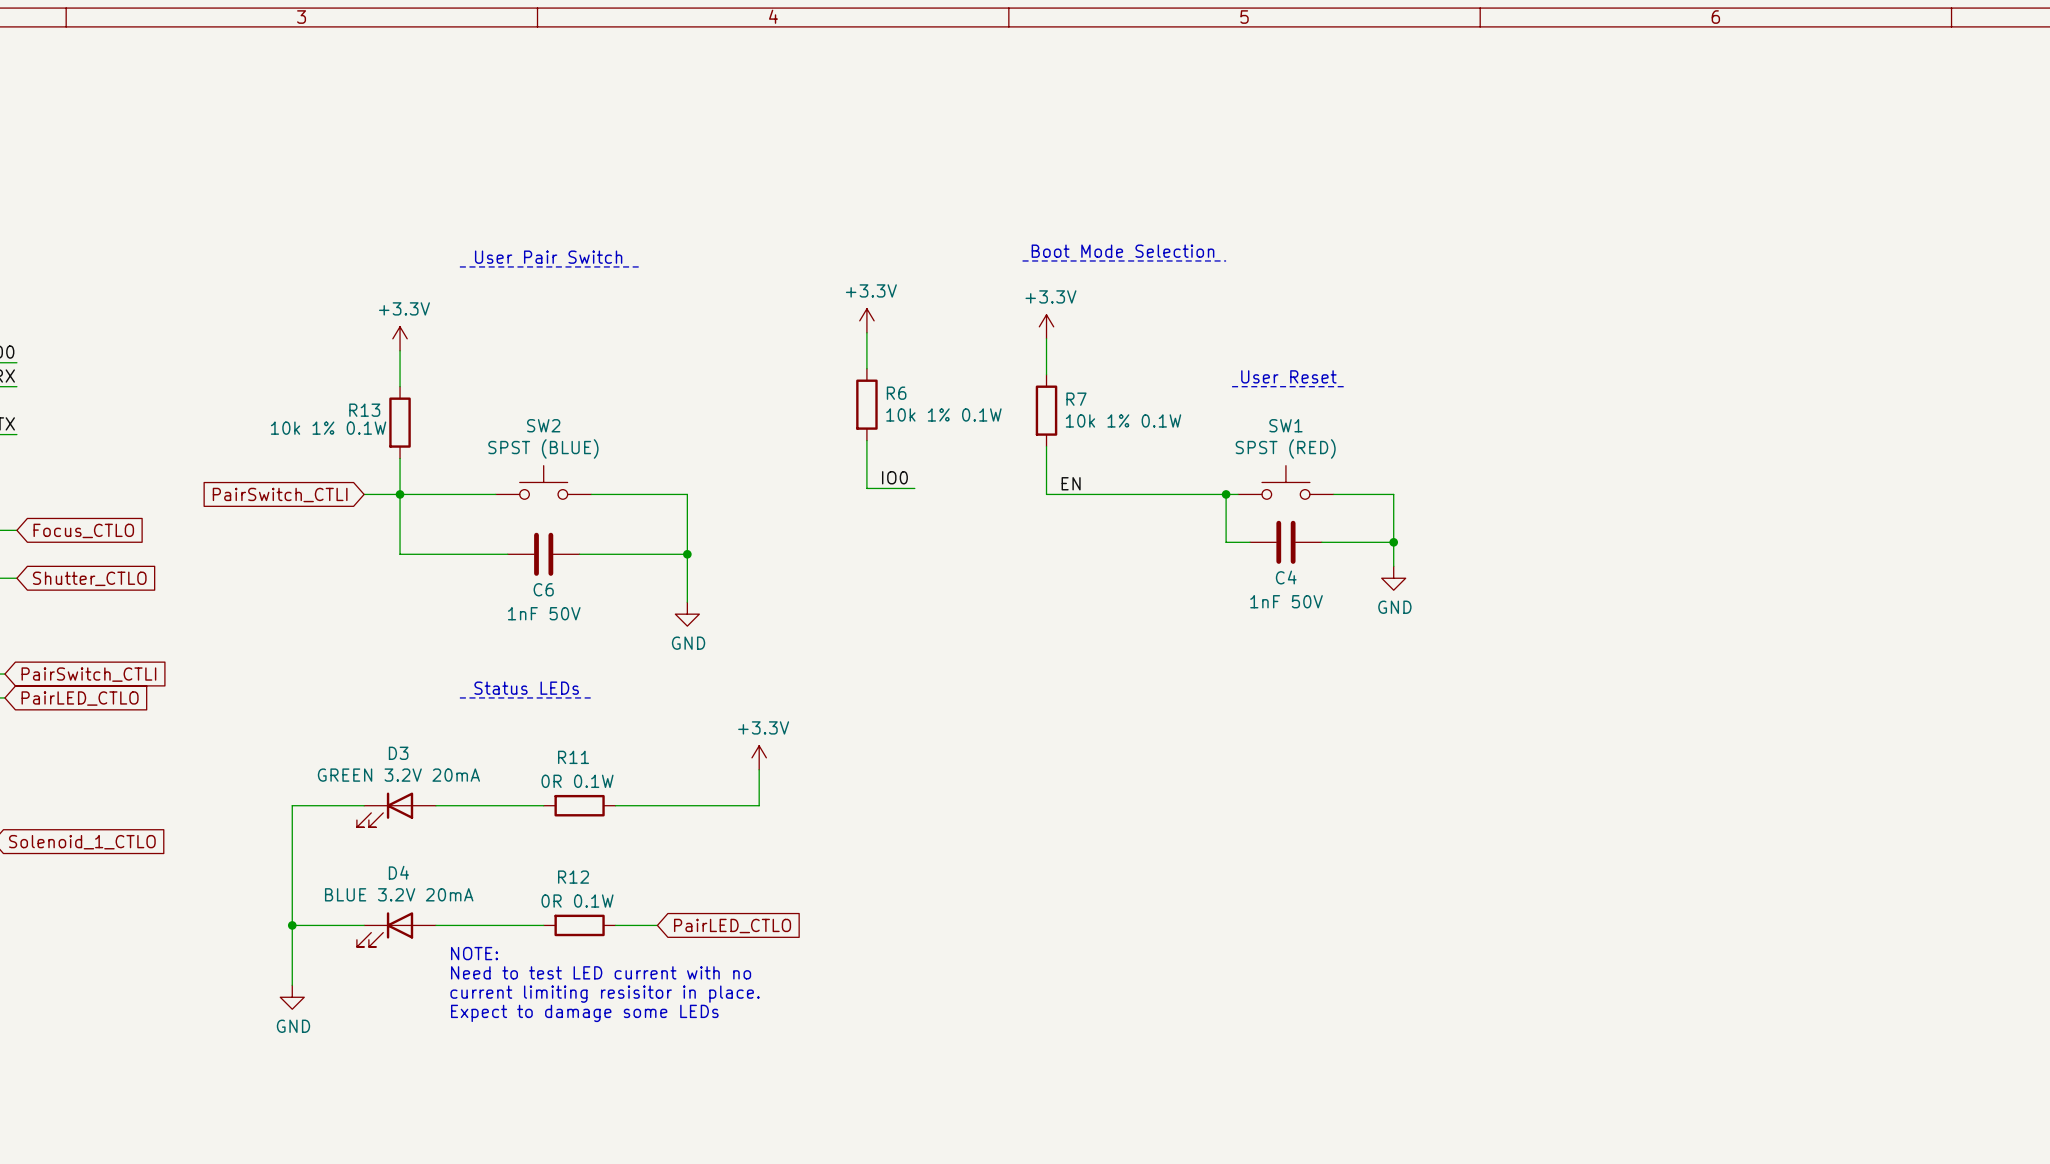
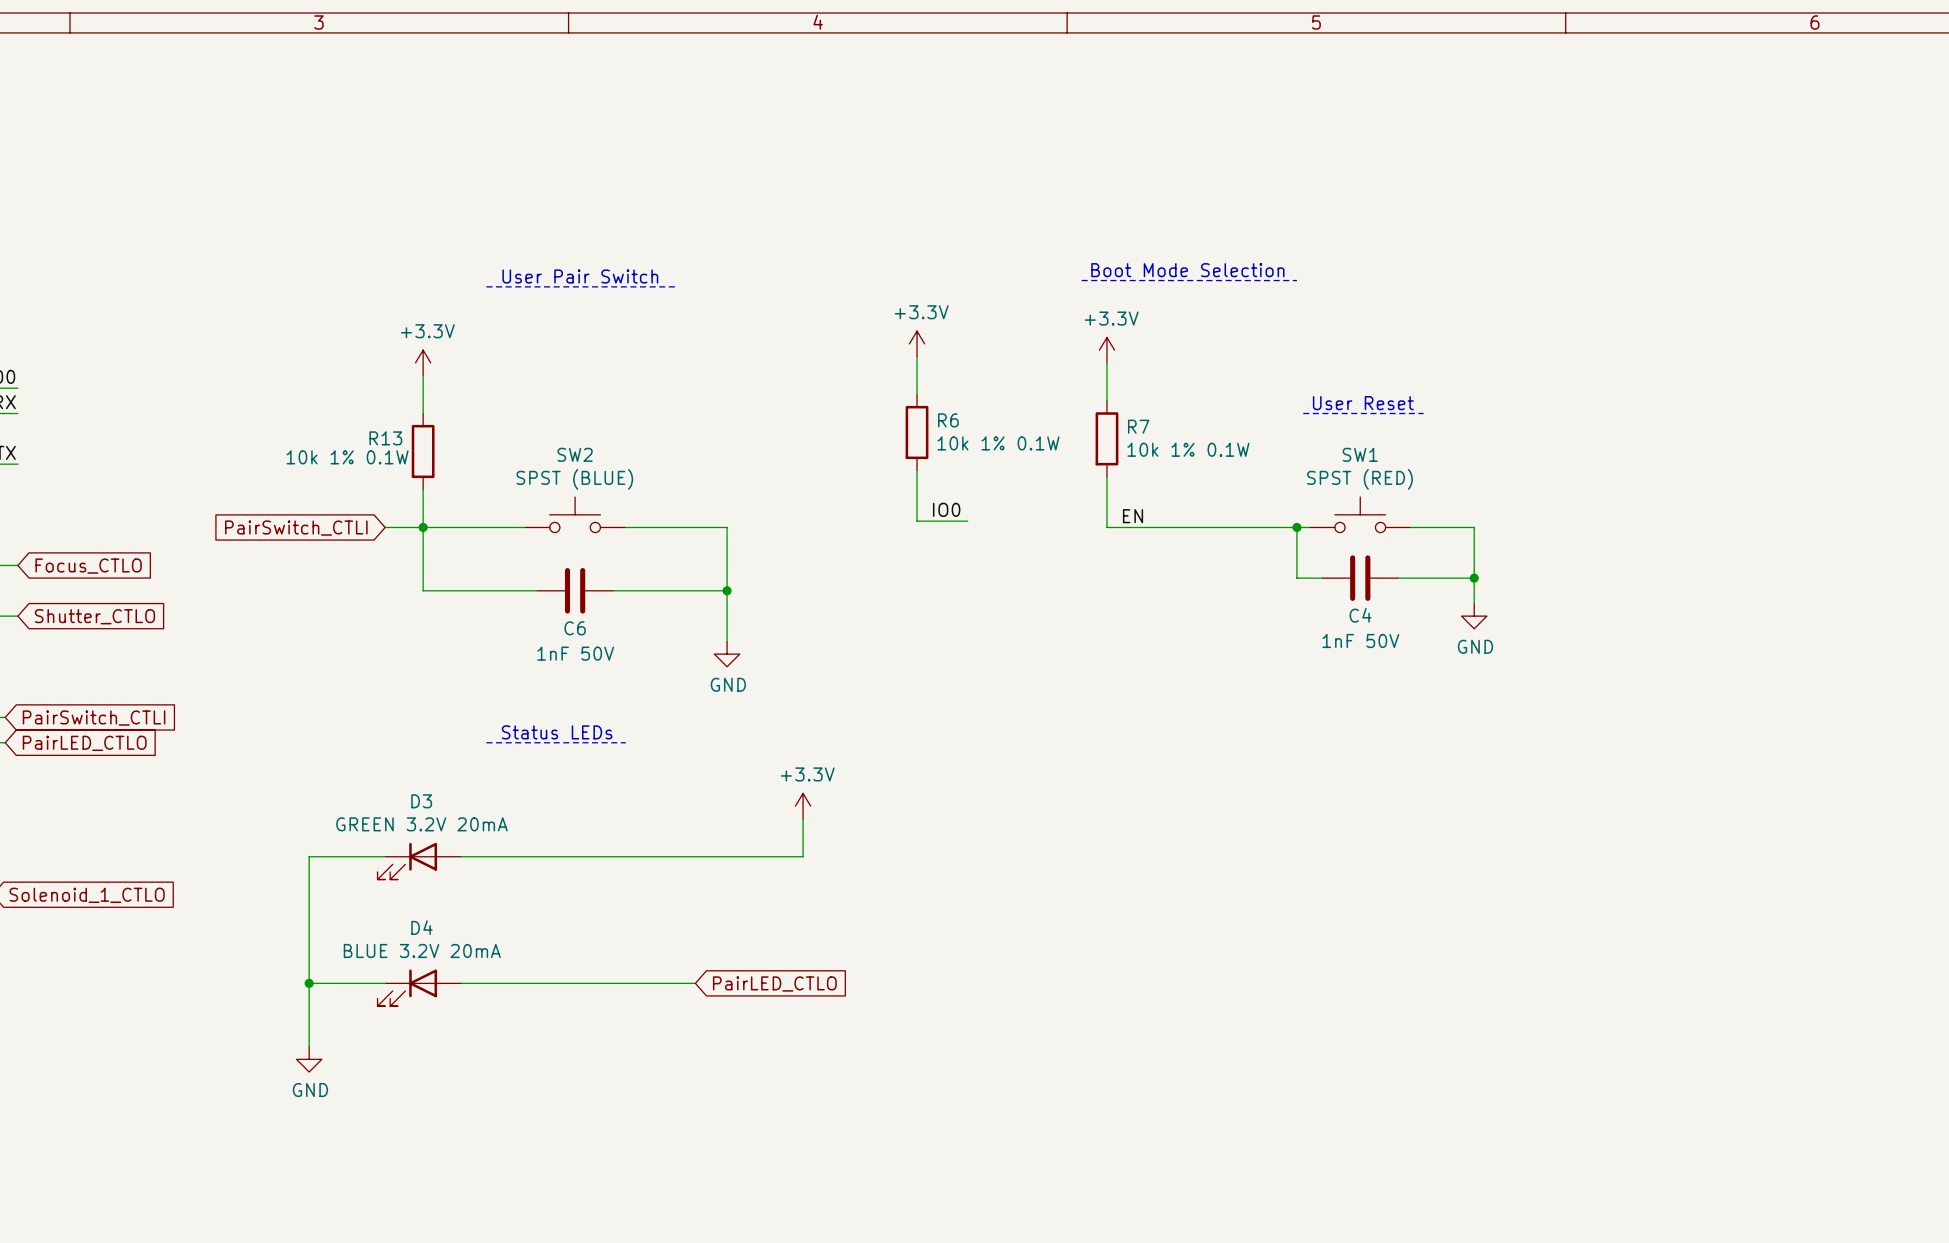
wire: none -> (575, 856) (651, 856)
R11: 0R 0.1W (579, 805) -> none
wire: none -> (575, 983) (651, 983)
R12: 0R 0.1W (579, 925) -> none
text: NOTE: (474, 953) -> none
text: Need to test LED current with no (601, 972) -> none
text: current limiting resisitor in place. (605, 994) -> none
text: Expect to damage some LEDs (584, 1013) -> none

